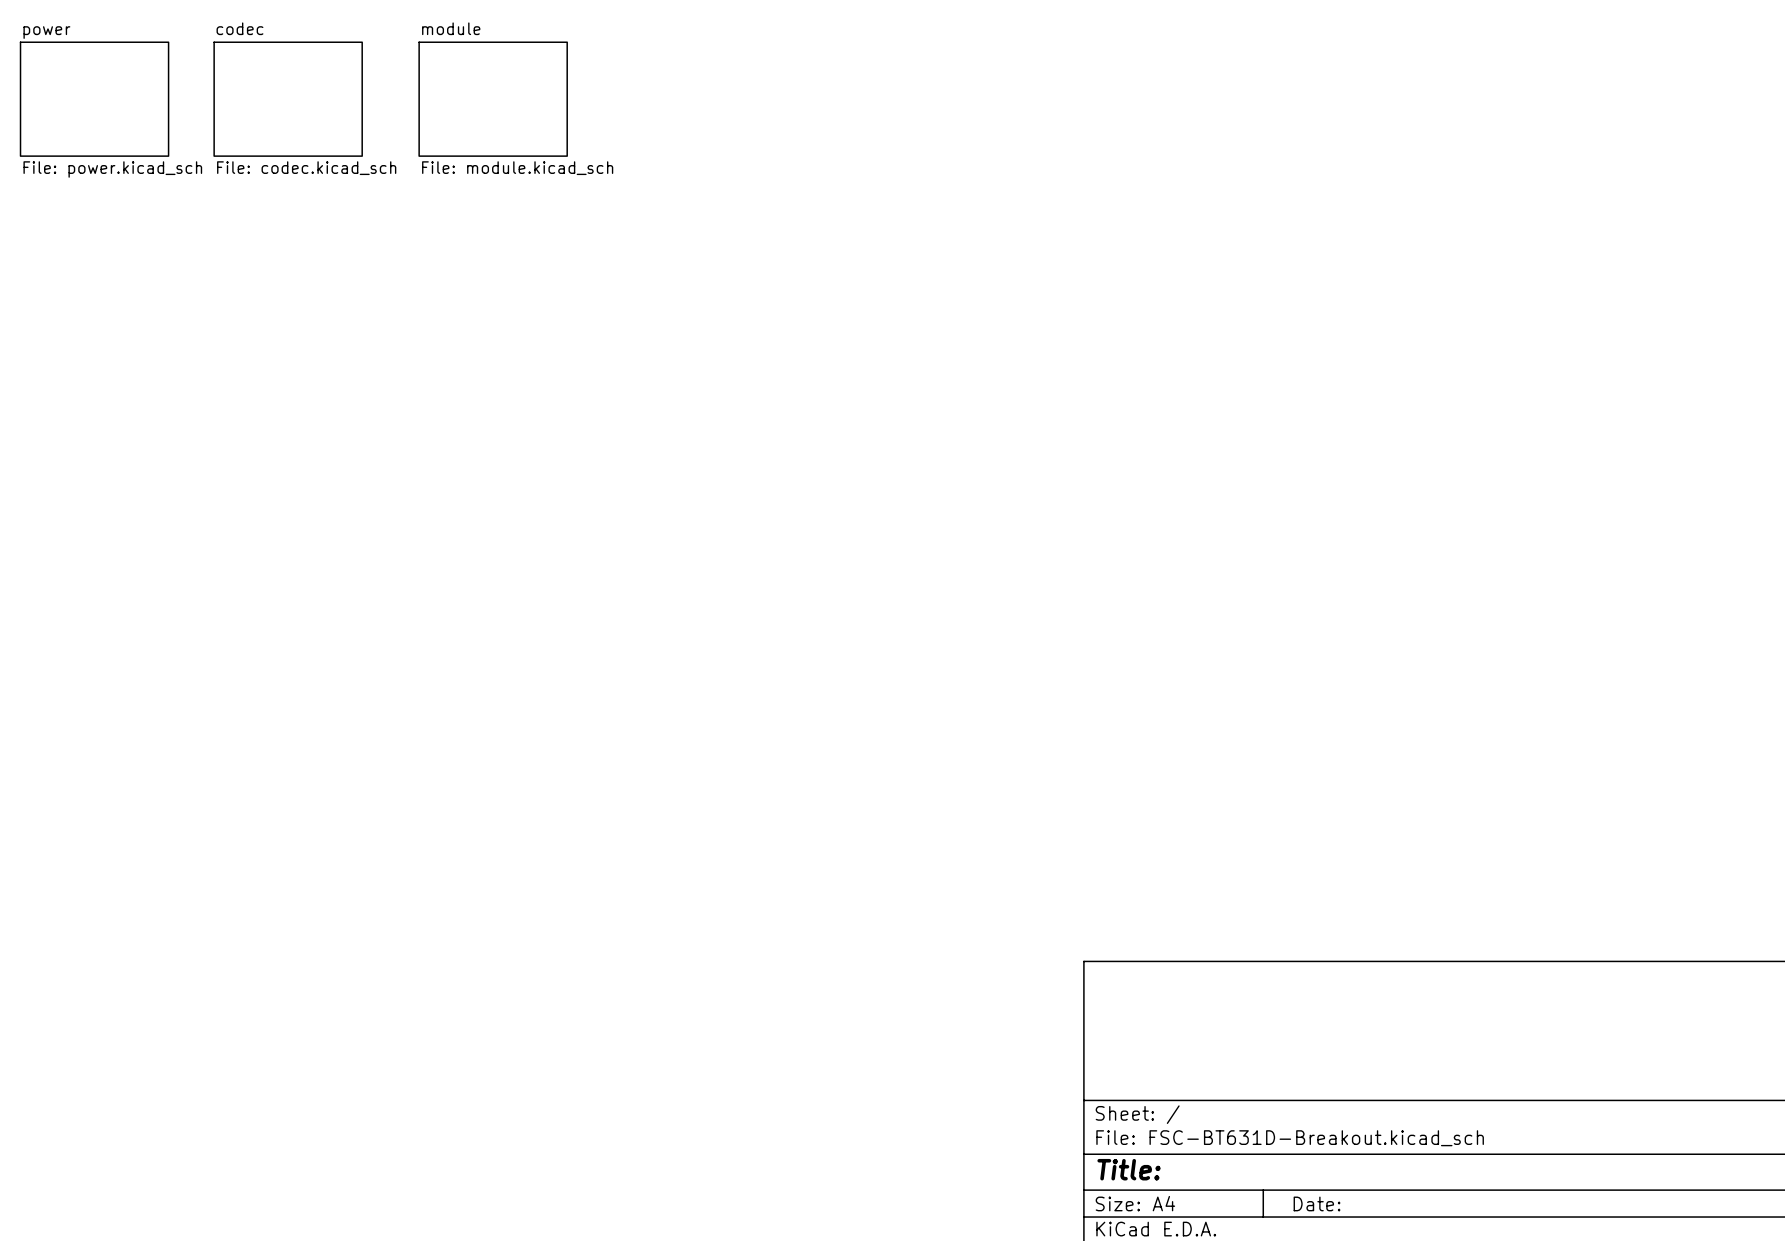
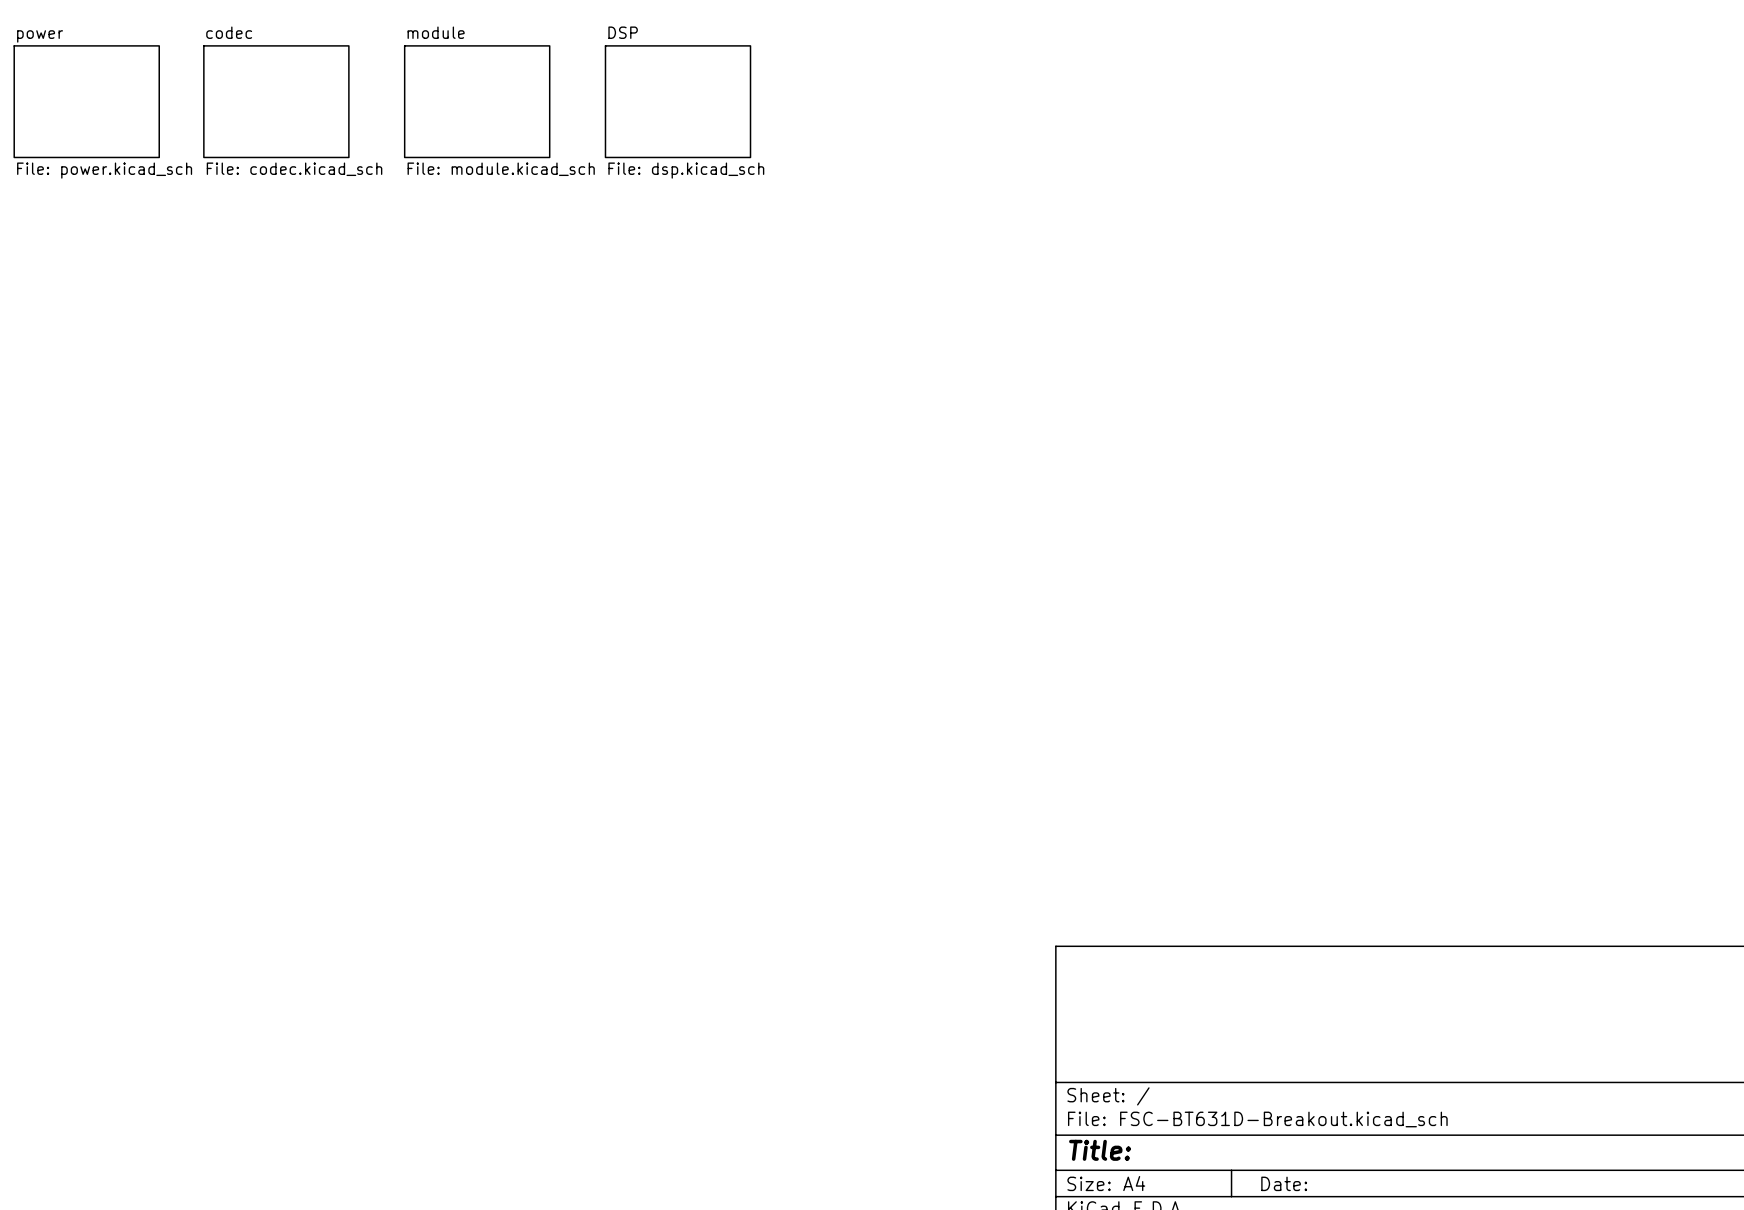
sheet DSP: none -> File: dsp.kicad_sch (677, 101)

